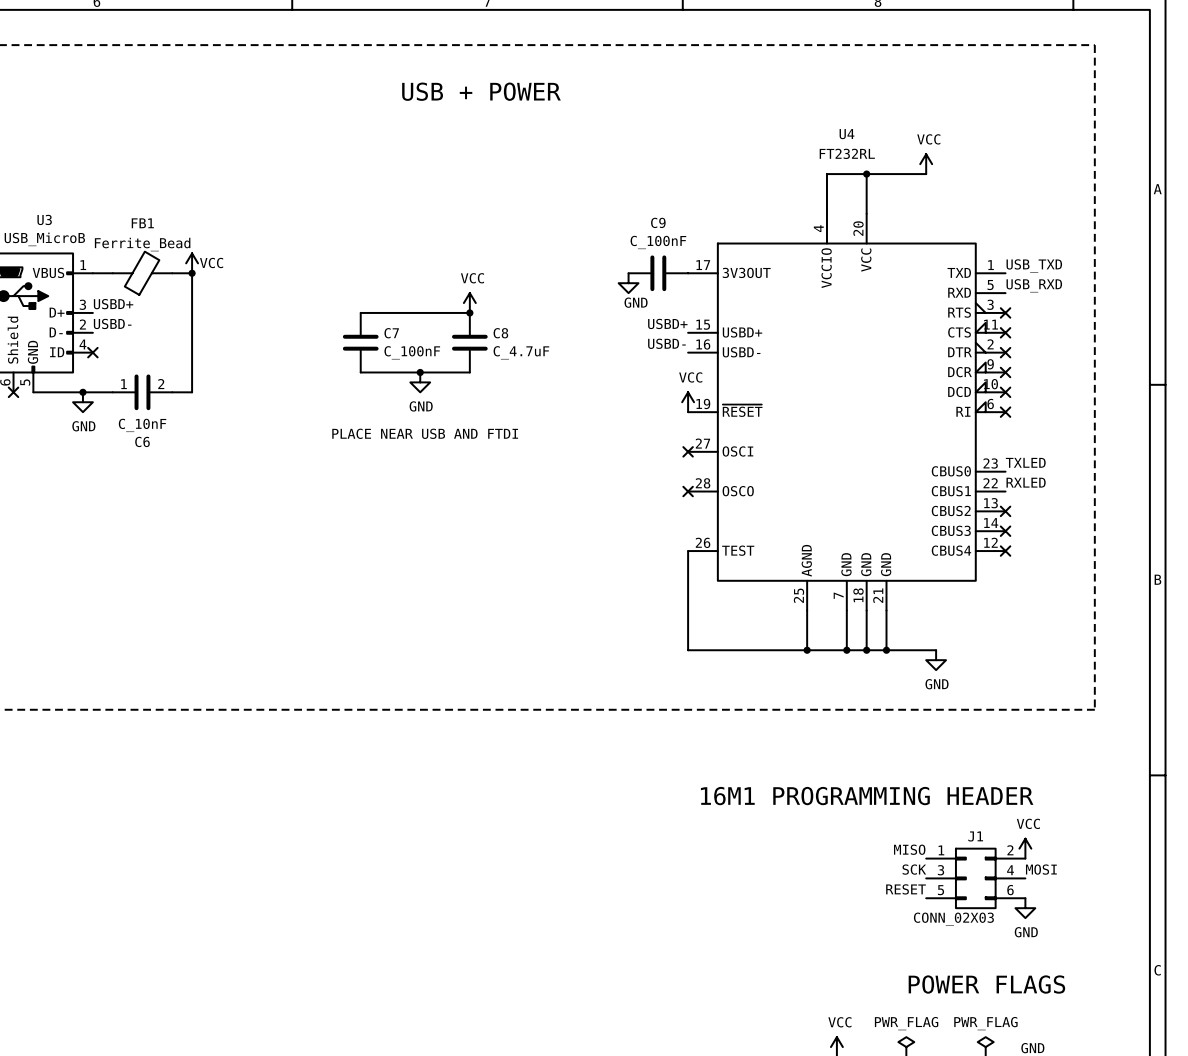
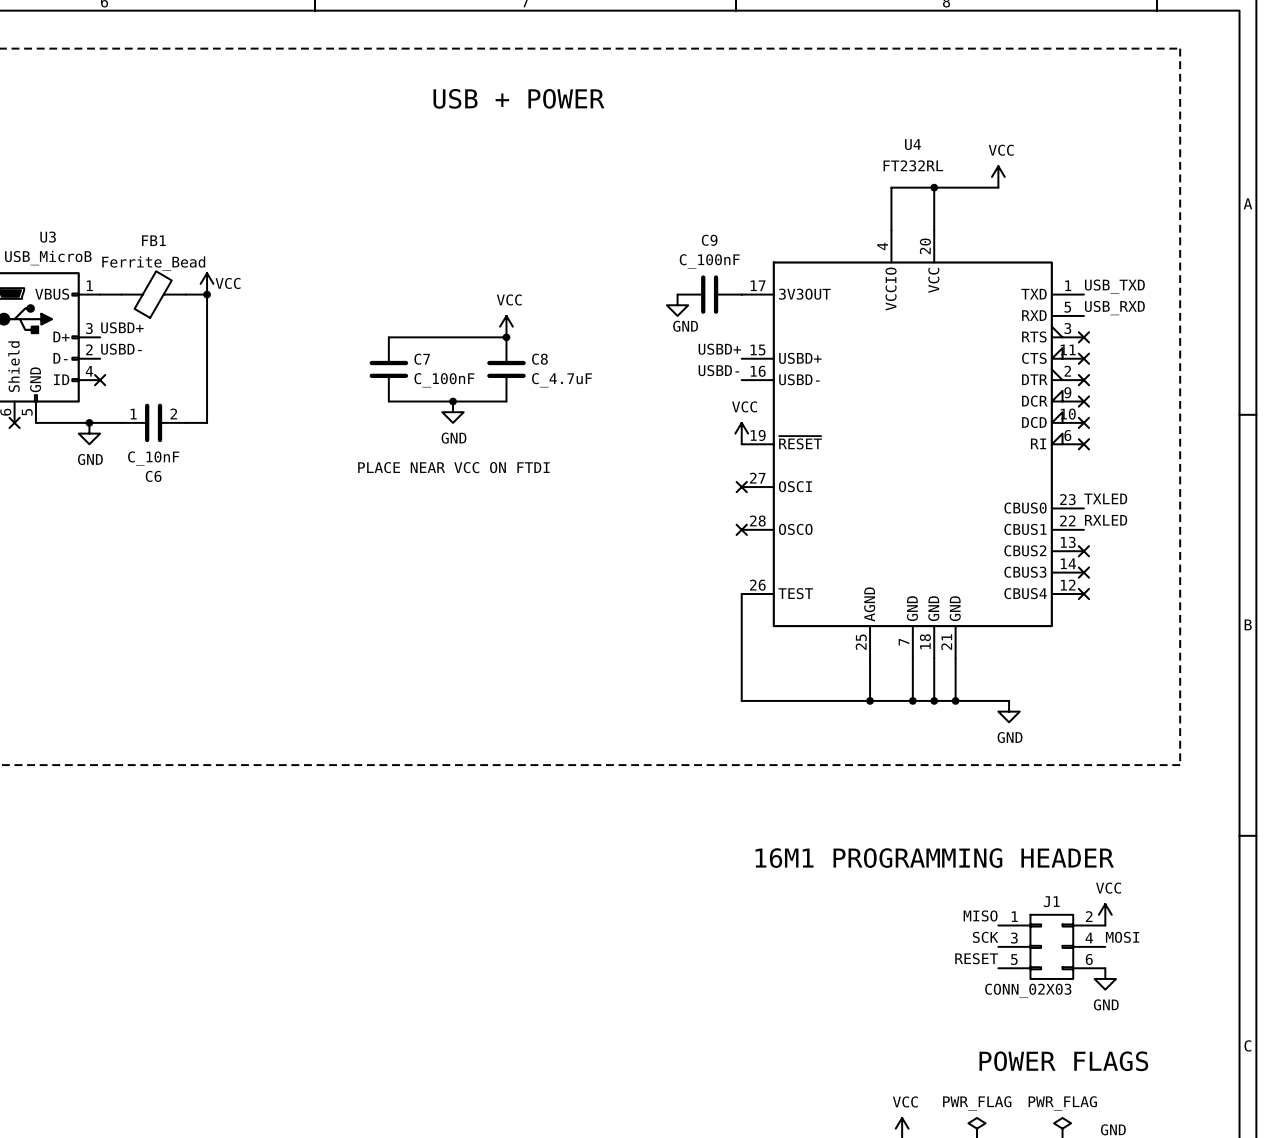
text: PLACE NEAR USB AND FTDI (425, 433) -> PLACE NEAR VCC ON FTDI (453, 467)

